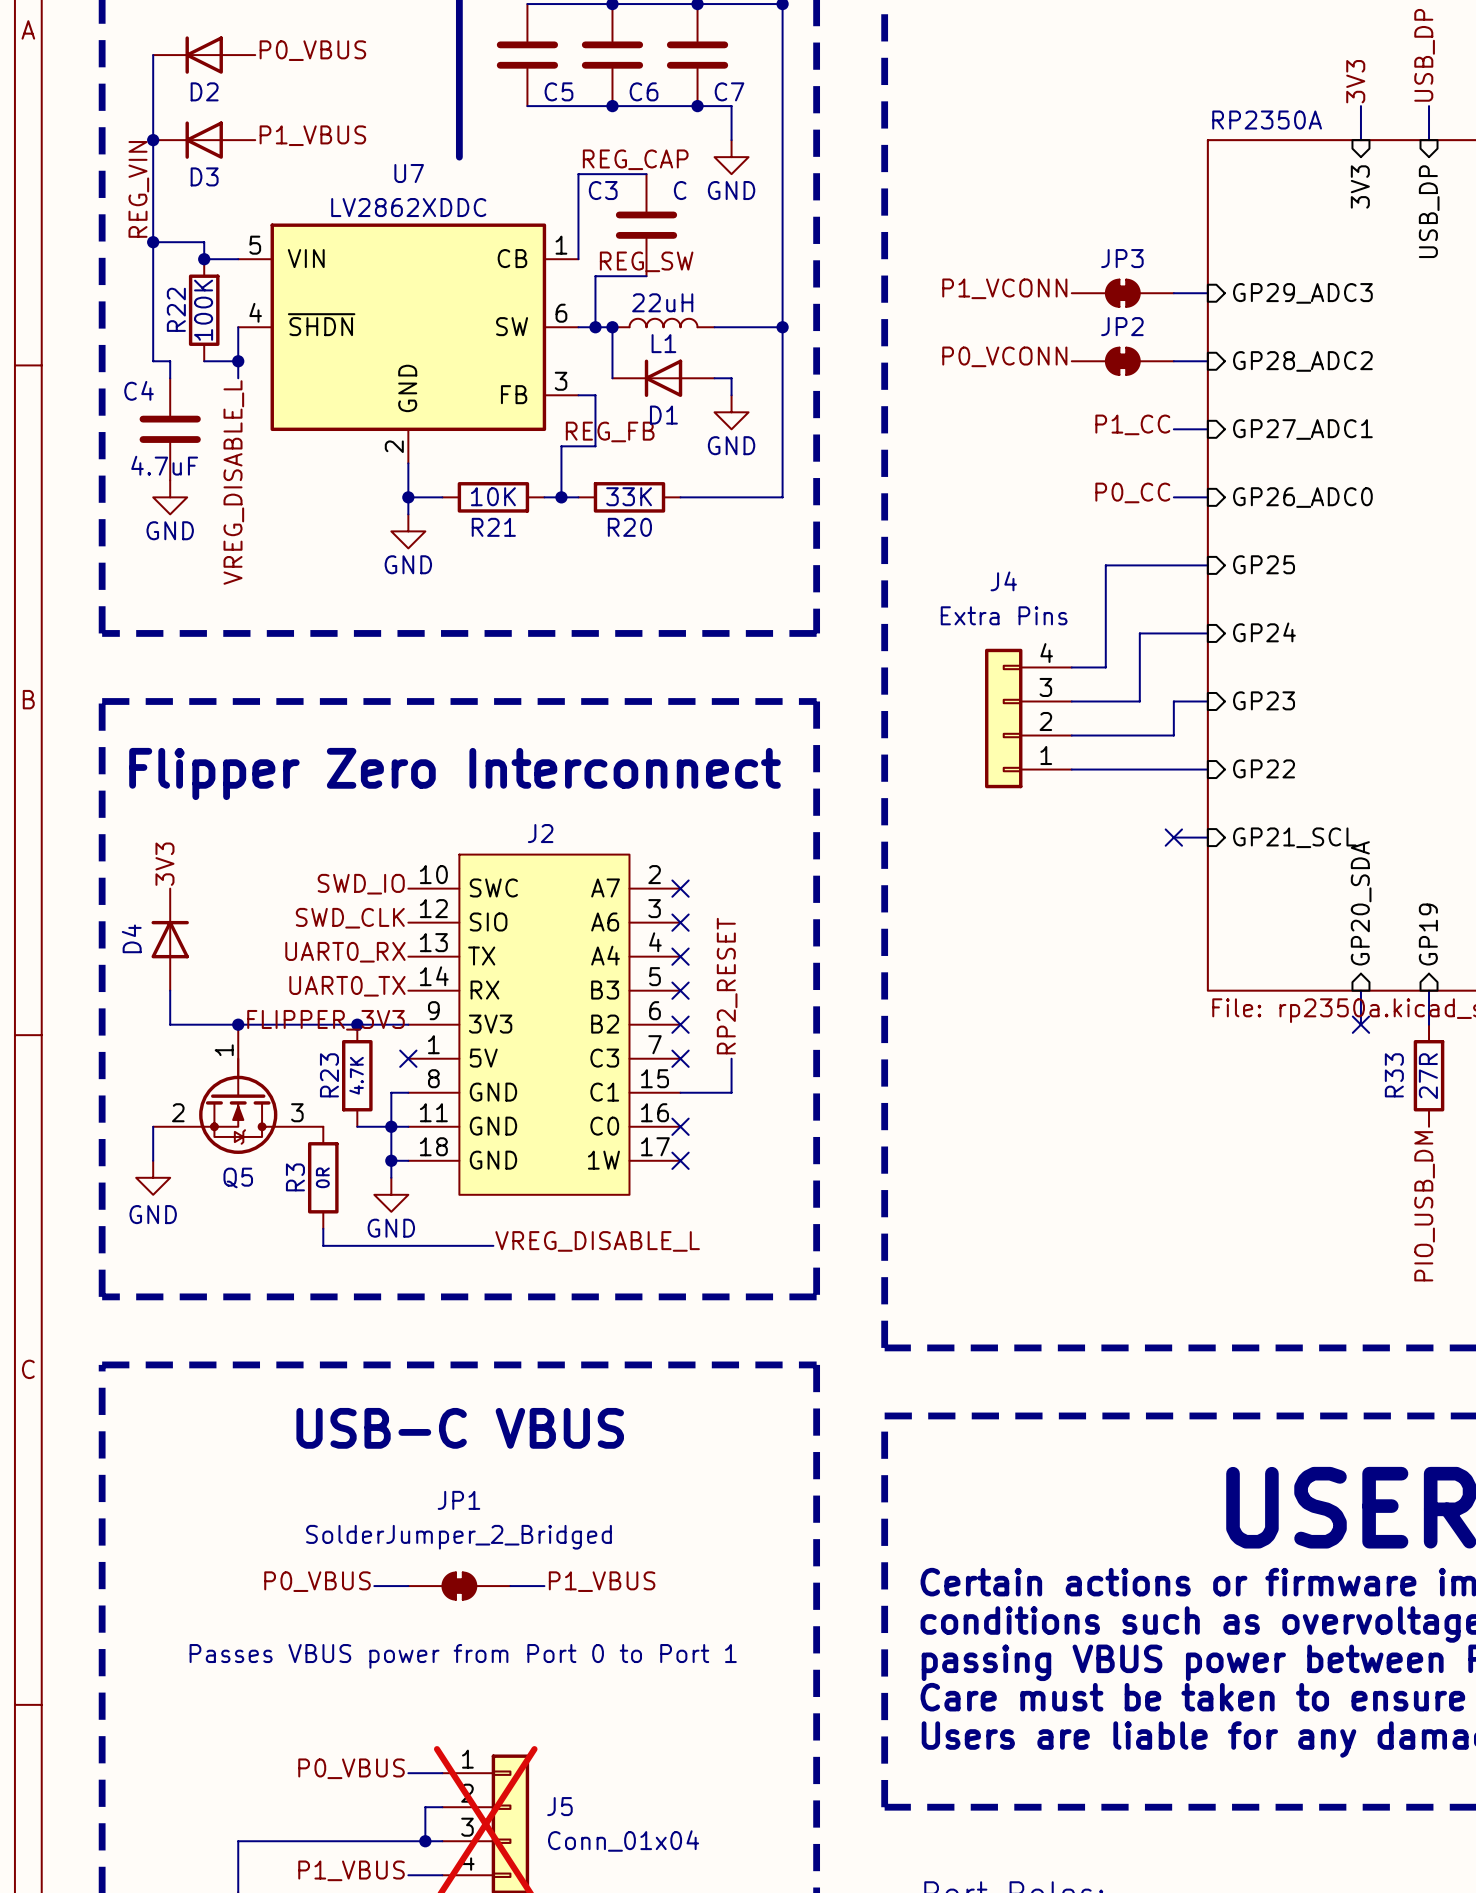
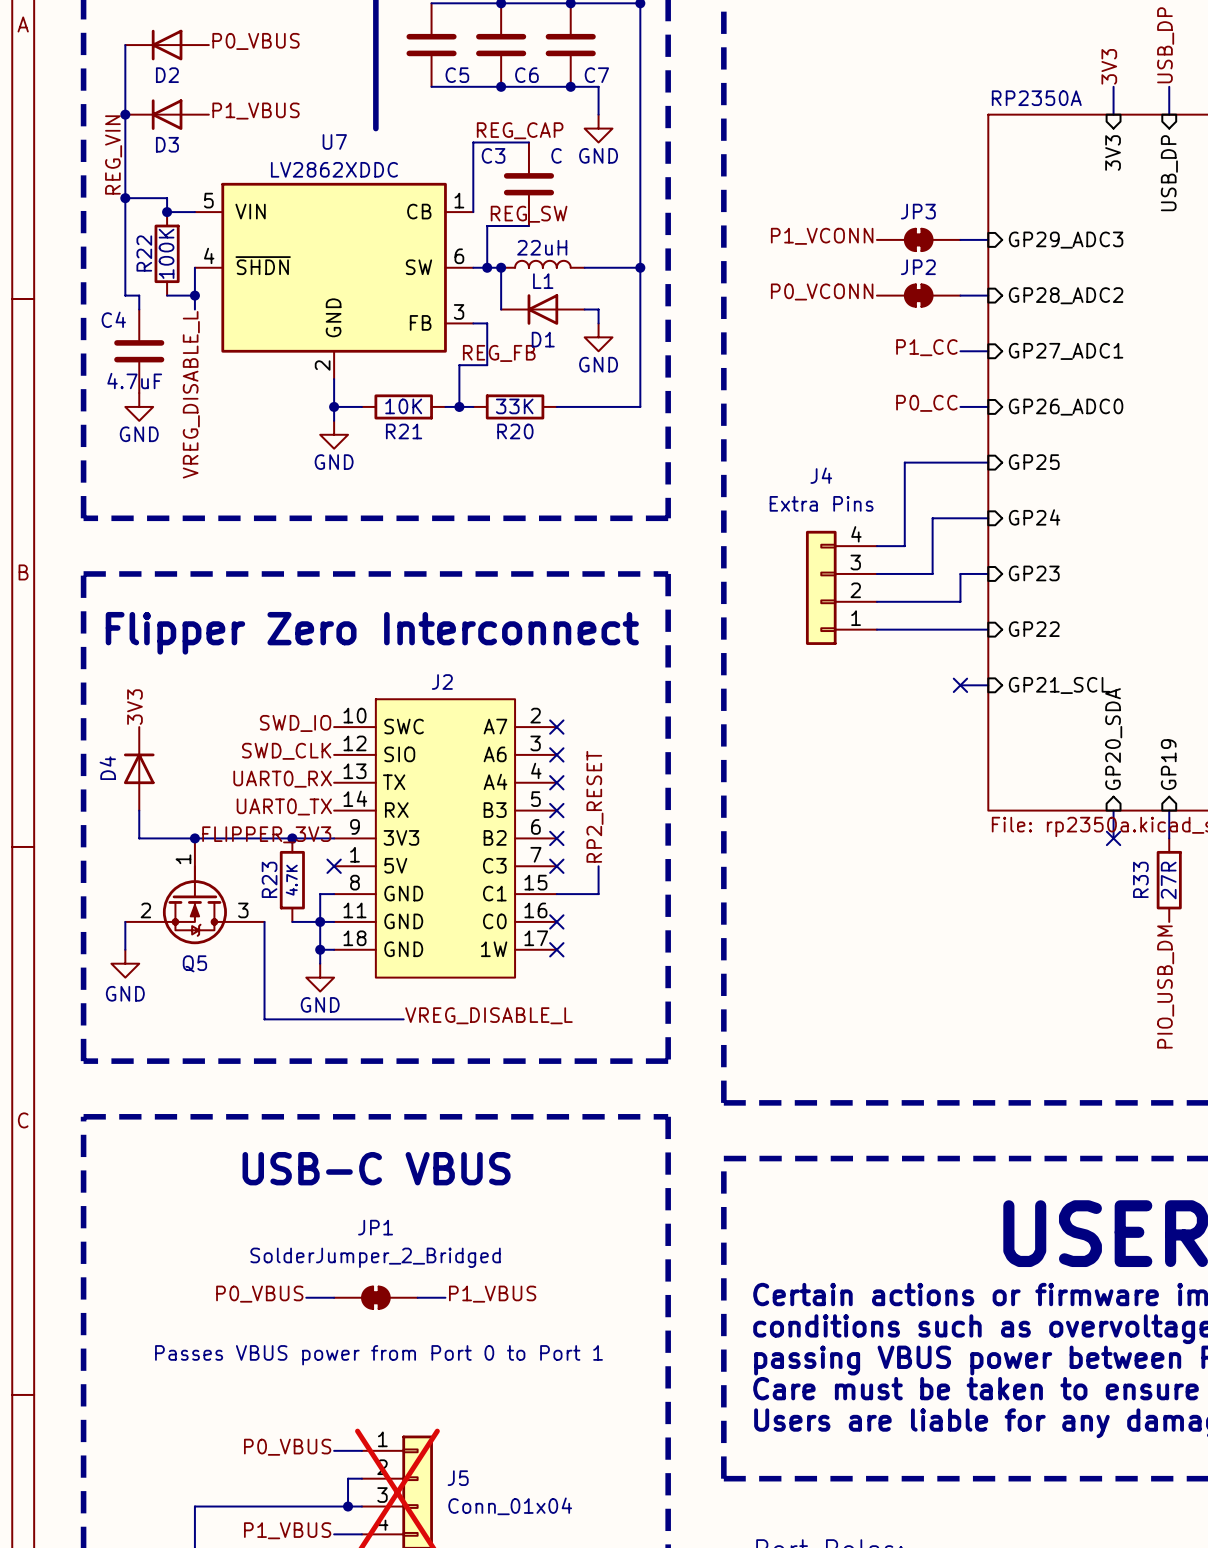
wire: none -> (264, 921) (264, 1005)
R3: 0R (323, 1177) -> none

